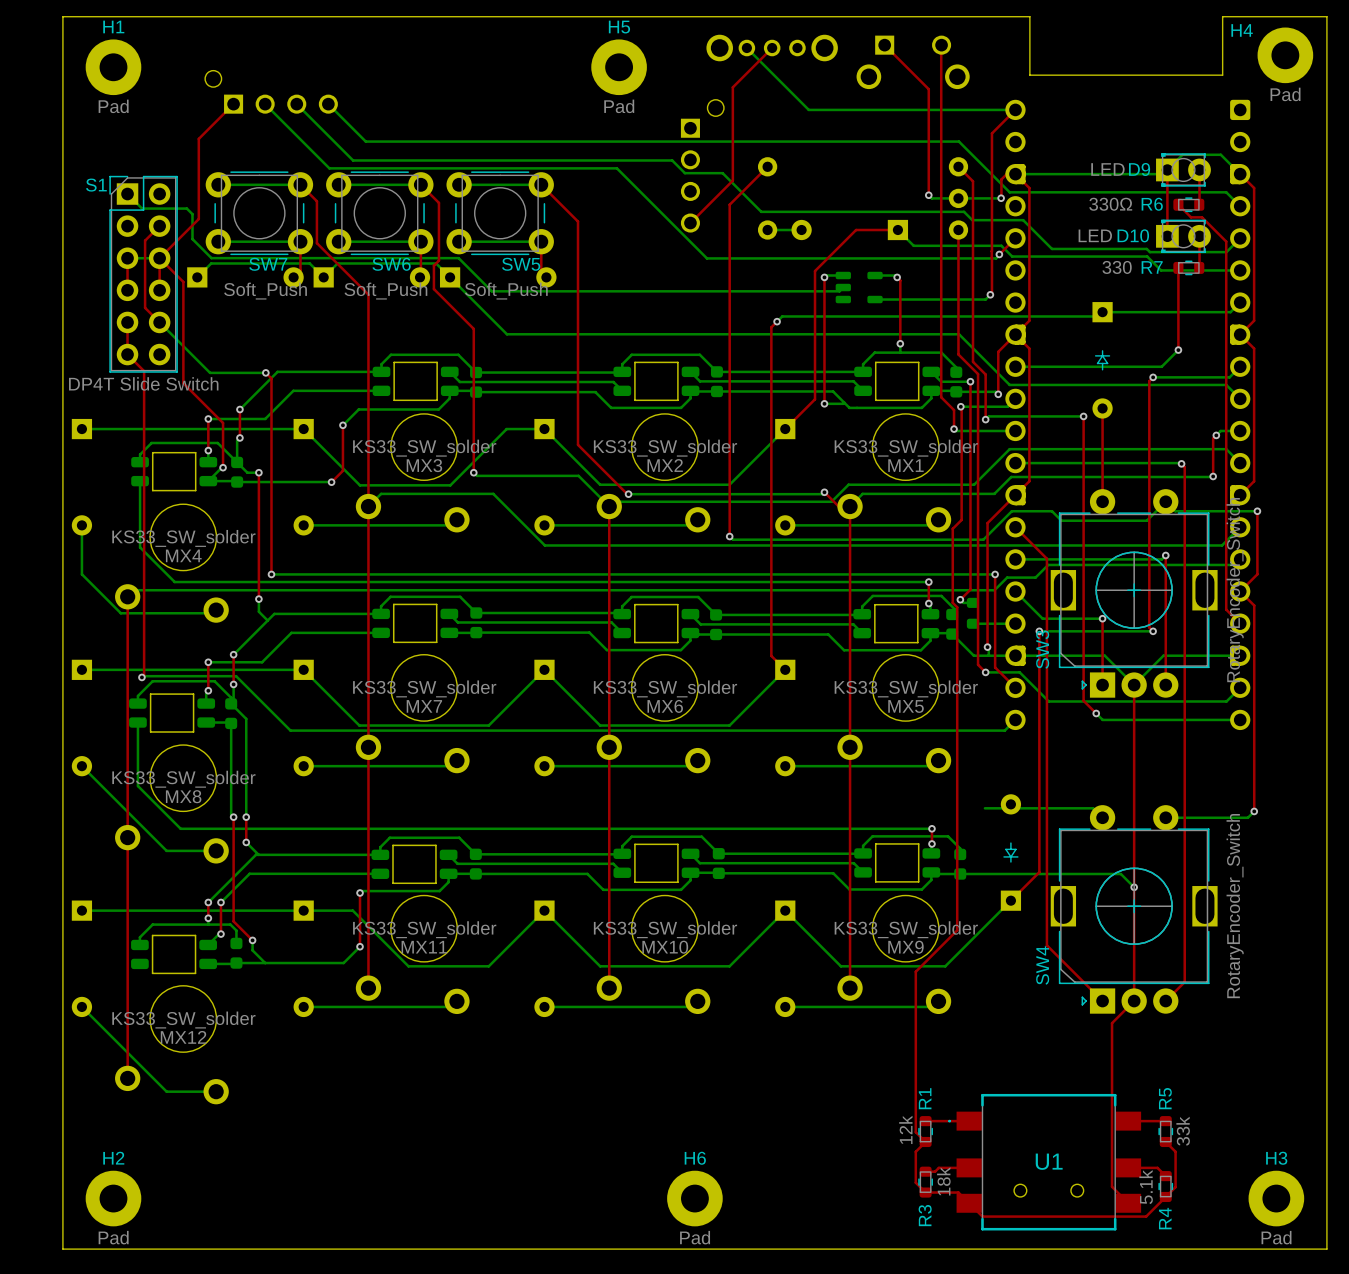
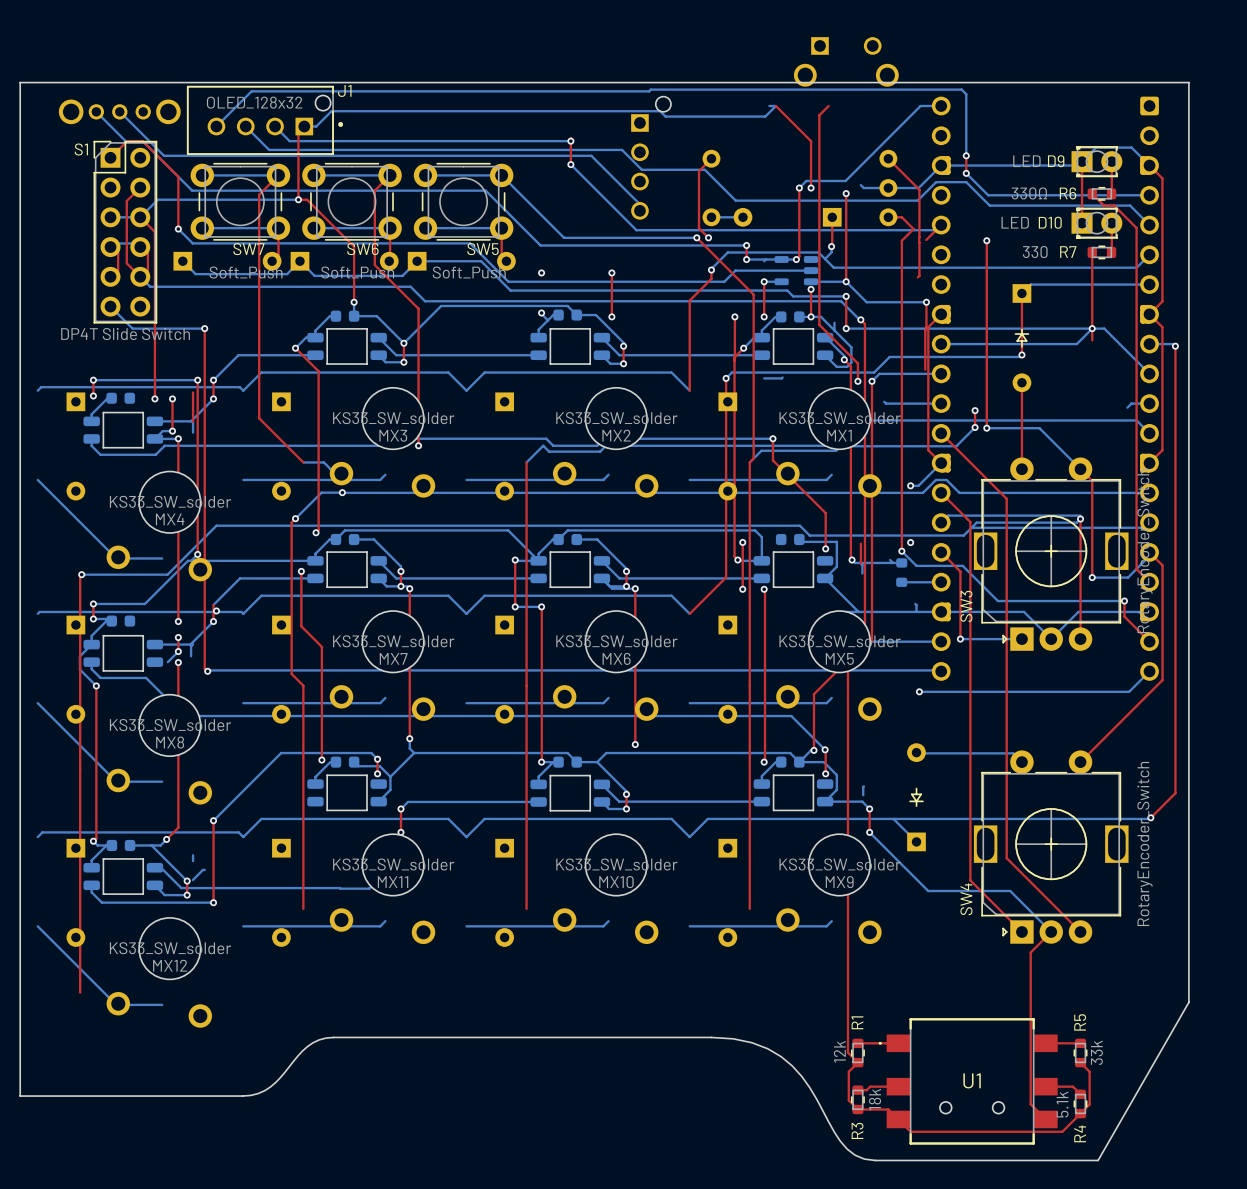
board edge: (62, 16) (1029, 16) (1029, 75) (1222, 75) (1222, 16) (1326, 16) (1326, 1249) (62, 1249) (62, 16) -> (20, 82) (20, 1096) (251, 1095) (264, 1090) (275, 1082) (307, 1046) (319, 1039) (333, 1037) (711, 1037) (752, 1042) (781, 1056) (792, 1065) (809, 1087) (840, 1141) (855, 1155) (864, 1159) (1098, 1160) (1188, 1002) (1188, 82) (20, 82)
top track: (884, 45) (928, 89) (928, 195) -> none
top track: (941, 45) (941, 397) (954, 410) (954, 429) -> none
bottom track: (746, 48) (808, 109) (830, 109) -> none
top track: (772, 48) (732, 87) (732, 180) (690, 223) -> none
part: (772, 48) -> none
H4: Pad (1285, 55) -> none
H1: Pad (113, 67) -> none
H5: Pad (619, 67) -> none
J1 side: bottom (271, 92) -> top (264, 120)
top track: (233, 104) (198, 138) (198, 219) (159, 258) (183, 281) (183, 383) (223, 422) (223, 467) -> none
bottom track: (265, 104) (329, 168) (616, 168) (707, 258) (996, 258) (999, 254) -> none
bottom track: (296, 104) (353, 160) (672, 160) (684, 173) (722, 173) (761, 211) (964, 211) (972, 220) (1023, 220) (1052, 248) (1146, 248) (1149, 252) (1226, 252) (1240, 238) -> (245, 126) (269, 149) (622, 149) (641, 169) (704, 169) (735, 200) (917, 200) (936, 182) (966, 182) (989, 205) (1130, 205) (1149, 225)
bottom track: (328, 104) (365, 141) (958, 141) (1009, 192) (1226, 192) (1240, 206) -> (966, 173) (988, 195) (1149, 195)
top track: none -> (775, 106) (811, 141) (811, 188)
bottom track: (837, 109) (993, 109) -> (799, 188) (806, 180) (845, 180) (920, 106)
bottom track: none -> (775, 106) (765, 116) (665, 116) (660, 111) (331, 111) (316, 126) (304, 127)
top track: none -> (828, 106) (819, 115) (819, 324) (857, 363) (857, 381)
top track: (1015, 109) (991, 133) (991, 200) -> (901, 172) (919, 189)
bottom track: none -> (96, 111) (125, 141) (142, 141) (192, 190) (485, 190) (540, 245) (746, 245)
bottom track: none -> (119, 111) (164, 155) (591, 155) (647, 211)
part: none -> (119, 111)
bottom track: none -> (216, 126) (251, 91) (961, 89) (966, 94) (966, 155)
bottom track: none -> (275, 126) (289, 141) (570, 141)
top track: none -> (304, 126) (298, 132) (298, 199) (307, 199) (354, 246) (354, 302)
top track: none -> (570, 138) (570, 164)
via: none -> (570, 141)
top track: none -> (966, 155) (966, 173)
via: none -> (966, 155)
top track: none -> (110, 157) (127, 141) (142, 141) (178, 176) (178, 229)
bottom track: none -> (570, 164) (636, 230) (936, 230) (941, 225)
via: none -> (570, 164)
top track: (754, 180) (729, 204) (729, 536) -> (699, 171) (699, 228) (708, 237)
top track: (973, 181) (973, 255) -> (888, 217) (901, 217) (913, 229) (901, 240)
via: none -> (966, 173)
top track: (300, 184) (316, 201) (316, 243) (368, 294) (368, 988) -> (278, 175) (259, 194) (259, 418) (303, 462)
top track: (420, 184) (438, 202) (438, 260) (433, 265) (433, 289) (473, 328) (473, 472) (475, 471) -> (390, 175) (374, 190) (374, 265) (418, 308) (418, 445)
top track: (541, 184) (578, 221) (578, 444) (628, 494) -> none
bottom track: none -> (501, 175) (564, 237) (696, 237)
bottom track: (127, 194) (142, 208) (186, 208) (192, 214) (192, 239) (211, 258) -> (178, 229) (192, 243) (196, 243)
via position: (928, 195) -> (846, 193)
top track: none -> (799, 188) (799, 256) (796, 259)
via: none -> (799, 188)
via: none -> (811, 188)
bottom track: (991, 198) (1000, 198) -> (918, 188) (941, 165)
top track: (1001, 198) (1001, 179) (1006, 174) (1015, 174) (1029, 188) (1029, 320) (1015, 334) (1029, 348) (1029, 481) (987, 523) (987, 647) -> none
via: (1001, 198) -> none
top track: none -> (846, 193) (846, 281)
bottom track: none -> (298, 199) (157, 199) (140, 217) (110, 217)
via: none -> (298, 199)
top track: (159, 226) (145, 240) (145, 307) (159, 322) -> (140, 187) (126, 201) (126, 263) (140, 276)
top track: none -> (140, 217) (154, 231) (154, 398)
top track: (897, 230) (856, 230) (815, 271) (815, 399) (785, 429) -> (832, 217) (831, 246)
bottom track: (897, 230) (913, 245) (1001, 245) (1012, 256) (1147, 256) (1161, 270) (1240, 270) -> (711, 270) (727, 252) (818, 252) (833, 267) (1136, 267) (1149, 254)
top track: (958, 230) (958, 354) (978, 374) (978, 664) (985, 672) -> none
via: none -> (178, 229)
top track: none -> (696, 237) (753, 294) (753, 458) (749, 462) (749, 908)
via: none -> (696, 237)
via: none -> (708, 237)
via: (999, 254) -> none
top track: none -> (986, 240) (986, 428)
via: none -> (986, 240)
bottom track: (458, 258) (491, 291) (839, 291) (843, 287) -> (425, 243) (470, 243) (508, 281) (724, 281) (735, 270) (811, 270)
top track: none -> (746, 245) (746, 259)
via: none -> (746, 245)
bottom track: none -> (831, 246) (831, 252) (825, 258)
via: none -> (831, 246)
S1 position: (143, 274) -> (125, 232)
bottom track: none -> (746, 259) (796, 259)
via: none -> (746, 259)
via: none -> (796, 259)
bottom track: (875, 275) (895, 275) (897, 277) -> none
bottom track: (197, 277) (211, 263) (309, 263) (323, 277) (337, 263) (436, 263) (506, 334) (959, 334) (1009, 384) (1226, 384) -> (182, 261) (195, 274) (287, 274) (299, 261) (314, 275) (402, 275) (417, 261) (481, 261) (510, 290) (787, 290) (793, 296) (846, 296)
top track: (824, 277) (824, 299) -> none
via: (824, 277) -> none
top track: (897, 277) (900, 280) (900, 343) -> none
via: (897, 277) -> none
top track: none -> (711, 270) (711, 278) (689, 300) (689, 390)
via: none -> (711, 270)
part rotation: 0° (859, 287) -> 180° (796, 270)
via: none -> (541, 272)
top track: none -> (611, 272) (611, 316)
via: none -> (611, 272)
bottom track: none -> (140, 276) (150, 286) (410, 286) (425, 301) (841, 301) (860, 319)
bottom track: (990, 294) (985, 299) (912, 299) -> (926, 302) (866, 302) (846, 281)
via position: (990, 294) -> (926, 302)
bottom track: none -> (764, 281) (781, 281)
via: none -> (764, 281)
via: none -> (846, 281)
bottom track: (1240, 302) (1230, 312) (1102, 312) (1098, 316) (782, 316) (777, 321) -> (1149, 284) (1030, 284) (1021, 293)
top track: none -> (811, 289) (811, 316)
via: none -> (811, 289)
top track: none -> (846, 296) (846, 328)
via: none -> (846, 296)
bottom track: none -> (354, 302) (354, 316) (376, 316) (403, 343) (441, 305) (567, 305) (576, 315) (595, 315) (623, 342) (623, 346)
via: none -> (354, 302)
top track: (777, 321) (771, 327) (771, 655) (785, 669) -> none
via: (777, 321) -> none
top track: none -> (926, 302) (926, 326) (928, 327) (928, 450) (941, 463)
top track: (127, 322) (127, 354) (144, 371) (144, 675) (141, 677) -> none
bottom track: (159, 322) (210, 372) (265, 372) -> none
bottom track: none -> (110, 306) (132, 328) (204, 328)
bottom track: none -> (541, 312) (547, 320)
via: none -> (541, 312)
bottom track: none -> (558, 315) (553, 315) (538, 329) (538, 337)
part: none -> (567, 315)
bottom track: none -> (335, 316) (329, 316) (315, 330) (315, 337) (306, 337) (295, 348)
part: none -> (345, 316)
via: none -> (611, 316)
top track: none -> (734, 316) (734, 360)
via: none -> (734, 316)
top track: (824, 337) (824, 403) -> (1021, 293) (1021, 354)
via: none -> (764, 316)
bottom track: none -> (775, 316) (761, 330) (761, 337) (754, 337) (743, 348)
part: none -> (790, 316)
bottom track: none -> (799, 316) (821, 316) (851, 347) (851, 362) (847, 366) (836, 366) (825, 355)
via: none -> (811, 316)
top track: none -> (860, 319) (864, 323) (863, 639)
via: none -> (860, 319)
via: (900, 343) -> none
top track: none -> (204, 328) (204, 668) (207, 671)
via: none -> (204, 328)
bottom track: none -> (846, 328) (1104, 328) (1136, 360)
via: none -> (846, 328)
top track: none -> (1092, 328) (1092, 340)
bottom track: none -> (378, 337) (396, 355) (538, 355)
bottom track: none -> (601, 337) (619, 355) (761, 355)
bottom track: none -> (825, 337) (844, 356) (844, 359)
top track: (973, 361) (985, 374) (985, 419) -> (901, 339) (901, 551)
top track: none -> (403, 343) (403, 362)
via: none -> (403, 343)
bottom track: (1240, 366) (1229, 377) (1153, 377) -> (1149, 344) (1173, 344) (1175, 346)
top track: none -> (623, 346) (623, 363)
via: none -> (623, 346)
top track: none -> (1175, 346) (1175, 793) (1150, 817)
via: none -> (1175, 346)
top track: none -> (295, 348) (318, 371) (318, 530) (316, 532)
via: none -> (295, 348)
bottom track: (449, 371) (459, 382) (613, 382) (622, 390) -> none
bottom track: (690, 371) (700, 381) (853, 381) (863, 390) -> none
top track: none -> (743, 348) (734, 357) (734, 556) (737, 560)
via: none -> (743, 348)
bottom track: (863, 371) (863, 364) (874, 352) (941, 352) (956, 367) (956, 372) -> none
bottom track: (863, 371) (716, 371) (699, 354) (631, 354) (622, 364) (621, 372) (476, 372) (458, 354) (391, 354) (381, 364) (381, 371) (277, 371) (239, 409) -> none
bottom track: (931, 371) (941, 381) (970, 381) -> none
top track: (265, 372) (271, 378) (271, 574) -> none
via: (265, 372) -> none
top track: (1153, 377) (1149, 381) (1149, 627) (1153, 631) -> none
via: (1153, 377) -> none
bottom track: none -> (315, 355) (238, 355) (213, 380)
bottom track: none -> (378, 355) (385, 362) (403, 362)
bottom track: none -> (601, 355) (610, 363) (623, 363)
bottom track: none -> (1021, 354) (1019, 356) (889, 356) (874, 372) (731, 372) (726, 378)
via: none -> (1021, 354)
part position: (415, 381) -> (347, 346)
part position: (656, 381) -> (570, 346)
part: (716, 381) -> none
part position: (897, 381) -> (793, 346)
top track: (970, 381) (970, 589) (960, 599) -> none
via: (970, 381) -> none
part: (476, 382) -> none
part: (956, 382) -> none
top track: none -> (844, 359) (850, 366) (852, 560)
via: none -> (844, 359)
via: none -> (403, 362)
via: none -> (623, 363)
bottom track: (381, 390) (293, 390) (265, 418) (208, 418) -> none
bottom track: (998, 394) (995, 391) (931, 390) (931, 398) (921, 407) (849, 407) (833, 391) (690, 390) (690, 398) (681, 407) (611, 407) (595, 392) (449, 390) (449, 398) (438, 409) (358, 409) (342, 425) -> none
via: (998, 394) -> none
bottom track: (1015, 398) (1007, 406) (960, 406) -> (941, 373) (879, 373) (871, 381)
top track: none -> (726, 378) (726, 577) (689, 613)
via: none -> (726, 378)
via: (824, 403) -> none
top track: none -> (93, 380) (93, 395)
bottom track: none -> (93, 380) (197, 380)
via: none -> (93, 380)
top track: none -> (197, 380) (197, 554)
via: none -> (197, 380)
top track: none -> (213, 380) (213, 398)
via: none -> (213, 380)
via: none -> (857, 381)
via: none -> (871, 381)
top track: (960, 406) (961, 519) (952, 528) (952, 602) (957, 607) (957, 930) (915, 971) (915, 1132) -> (871, 381) (871, 640) (847, 664) (848, 1053)
via: (960, 406) -> none
top track: (239, 409) (239, 437) -> none
via: (239, 409) -> none
top track: (1083, 416) (1083, 700) (1096, 713) -> none
bottom track: (1083, 416) (988, 416) (985, 419) -> none
via: (1083, 416) -> none
bottom track: none -> (37, 390) (41, 387) (239, 387) (243, 390) (261, 372) (448, 372) (466, 390) (484, 372) (671, 372) (689, 390)
via: (208, 418) -> none
via: (985, 419) -> none
via: none -> (93, 395)
bottom track: none -> (111, 398) (107, 398) (91, 414) (91, 421)
part: none -> (120, 398)
via: none -> (154, 398)
top track: none -> (172, 398) (172, 431)
via: none -> (172, 398)
bottom track: none -> (213, 398) (191, 421) (154, 421)
via: none -> (213, 398)
top track: (342, 425) (342, 470) (331, 482) -> none
via: (342, 425) -> none
bottom track: (81, 429) (303, 429) (359, 485) (450, 485) (506, 429) (544, 429) (600, 484) (729, 484) (785, 429) -> none
via: (954, 429) -> none
top track: (1216, 435) (1213, 438) (1213, 476) -> none
via: (1216, 435) -> none
bottom track: (239, 437) (237, 440) (237, 462) -> none
via: (239, 437) -> none
top track: none -> (975, 410) (975, 427)
via: none -> (975, 410)
bottom track: (1009, 449) (974, 484) (848, 484) (831, 501) (614, 501) (609, 506) (578, 475) (476, 475) (473, 472) -> (935, 420) (859, 420) (834, 445) (606, 445) (600, 451) (549, 451) (543, 445) (526, 462)
via: (208, 450) -> none
via: none -> (975, 427)
bottom track: none -> (986, 428) (1039, 428) (1080, 469)
via: none -> (986, 428)
bottom track: none -> (172, 431) (162, 431) (154, 438) (178, 438)
via: none -> (172, 431)
bottom track: (140, 462) (140, 454) (151, 442) (217, 442) (247, 472) (258, 472) -> none
bottom track: (1015, 463) (1181, 463) -> none
top track: (1181, 463) (1184, 467) (1184, 982) (1165, 1001) -> (941, 433) (1006, 498) (1006, 858) (1080, 932)
via: (1181, 463) -> none
bottom track: (223, 467) (208, 481) (331, 482) -> none
via: (223, 467) -> none
top track: none -> (178, 438) (178, 621)
via: none -> (178, 438)
top track: none -> (772, 438) (772, 460) (825, 513) (825, 548)
bottom track: none -> (772, 438) (604, 438) (597, 445) (553, 445) (546, 438) (410, 438) (403, 445) (164, 445) (155, 454) (100, 454) (91, 445) (91, 438)
part position: (174, 471) -> (123, 430)
part: (237, 472) -> none
top track: (258, 472) (258, 599) -> none
via: (258, 472) -> none
via position: (473, 472) -> (418, 445)
bottom track: (1213, 476) (1031, 477) -> (975, 427) (956, 446)
via: (1213, 476) -> none
bottom track: (1011, 477) (994, 493) (862, 493) (850, 506) -> (937, 446) (840, 446) (836, 450) (761, 450) (749, 462)
bottom track: (140, 481) (140, 547) (174, 582) (928, 582) -> none
via: (331, 482) -> none
top track: (824, 492) (838, 506) (850, 506) (850, 988) -> none
bottom track: (824, 492) (822, 494) (628, 494) -> none
via position: (824, 492) -> (772, 438)
bottom track: none -> (303, 462) (323, 462) (330, 469) (342, 469)
via: (628, 494) -> none
bottom track: none -> (941, 463) (918, 485) (910, 485)
top track: none -> (1080, 469) (1092, 480) (1092, 577)
bottom track: (368, 506) (381, 493) (493, 493) (544, 545) (1222, 545) (1240, 527) -> none
top track: (609, 506) (609, 988) -> (526, 462) (526, 908)
top track: (1257, 511) (1257, 574) (1240, 591) -> none
bottom track: (1257, 511) (1175, 511) (1165, 501) (1146, 520) (1061, 520) (1052, 511) (1011, 511) (1009, 513) -> (1149, 492) (959, 492) (946, 479) (935, 479)
via: (1257, 511) -> none
bottom track: none -> (37, 479) (116, 558) (162, 558)
bottom track: (456, 519) (451, 525) (303, 525) -> (385, 474) (380, 479) (243, 479)
bottom track: (697, 519) (692, 525) (544, 525) -> (608, 474) (603, 479) (466, 479)
bottom track: (938, 519) (932, 525) (785, 525) -> (831, 474) (826, 479) (689, 479)
via: none -> (910, 485)
bottom track: (81, 525) (81, 574) (120, 613) (212, 613) (216, 610) -> none
via: none -> (342, 492)
bottom track: (995, 527) (983, 539) (732, 539) (729, 536) -> (923, 492) (321, 492) (295, 518)
via: (729, 536) -> none
bottom track: none -> (1080, 515) (948, 515) (941, 522)
top track: none -> (295, 518) (291, 522) (291, 673) (303, 685) (303, 908)
via: none -> (295, 518)
bottom track: (1015, 559) (1053, 559) -> (971, 527) (976, 522)
via: none -> (316, 532)
bottom track: (1039, 573) (1035, 577) (1007, 577) (994, 590) (134, 590) -> (963, 535) (809, 535) (799, 525) (216, 525) (167, 574) (81, 574)
bottom track: (271, 574) (995, 574) -> none
via: (271, 574) -> none
top track: (995, 574) (995, 667) (1015, 687) -> none
via: (995, 574) -> none
part: none -> (345, 539)
bottom track: none -> (354, 539) (374, 539) (400, 566) (400, 571)
part: none -> (567, 539)
bottom track: none -> (576, 539) (597, 539) (626, 568) (626, 571)
part: none -> (790, 539)
bottom track: none -> (799, 539) (801, 541) (836, 541) (836, 566) (825, 578) (858, 611)
top track: none -> (742, 542) (742, 589)
via: none -> (742, 542)
via: none -> (910, 542)
via: (928, 582) -> none
via: none -> (825, 548)
bottom track: none -> (901, 551) (916, 565) (962, 565) (997, 601) (1124, 601)
via: none -> (901, 551)
top track: none -> (941, 552) (960, 571) (960, 639)
bottom track: (1015, 591) (1042, 618) (1102, 618) -> none
bottom track: none -> (1149, 552) (1149, 556) (1128, 577) (1092, 577)
bottom track: none -> (197, 554) (191, 560)
via: none -> (197, 554)
top track: (127, 596) (127, 1078) -> none
bottom track: (258, 599) (258, 611) (267, 620) -> none
via: (258, 599) -> none
top track: none -> (515, 560) (515, 606)
bottom track: none -> (515, 560) (538, 560)
via: none -> (515, 560)
bottom track: none -> (737, 560) (761, 560) (761, 537) (755, 530) (567, 530) (558, 539) (552, 539) (538, 553) (538, 560)
via: none -> (737, 560)
bottom track: none -> (852, 560) (854, 562) (893, 562)
via: none -> (852, 560)
via: (960, 599) -> none
bottom track: none -> (378, 560) (396, 578) (538, 578)
bottom track: none -> (538, 560) (508, 530) (345, 530) (335, 539) (329, 539) (315, 553) (315, 560) (188, 560) (144, 603) (93, 603)
bottom track: none -> (601, 560) (619, 578) (761, 578)
via: (928, 603) -> none
top track: none -> (301, 571) (301, 626) (321, 646) (321, 760)
via: none -> (301, 571)
top track: none -> (400, 571) (400, 586)
via: none -> (400, 571)
top track: none -> (626, 571) (626, 586)
via: none -> (626, 571)
bottom track: (449, 613) (457, 622) (611, 622) (622, 633) -> none
bottom track: (690, 614) (700, 624) (853, 624) (862, 633) -> none
bottom track: (954, 614) (954, 609) (941, 595) (872, 595) (862, 606) (861, 614) (716, 614) (698, 597) (631, 597) (622, 606) (622, 614) (476, 613) (460, 596) (390, 596) (381, 606) (381, 613) (274, 613) (233, 654) -> none
top track: none -> (81, 574) (80, 576) (80, 992)
via: none -> (81, 574)
top track: (1102, 618) (1102, 685) -> none
via: (1102, 618) -> none
bottom track: none -> (315, 578) (240, 578) (213, 604)
bottom track: none -> (378, 578) (386, 586) (407, 586) (409, 588)
bottom track: none -> (601, 578) (612, 588) (635, 588)
part: (476, 622) -> none
part position: (415, 623) -> (347, 569)
part position: (656, 623) -> (570, 569)
part position: (896, 623) -> (793, 569)
part: (716, 624) -> none
part: (952, 624) -> none
via: none -> (400, 586)
bottom track: none -> (609, 586) (626, 586)
via: none -> (626, 586)
top track: none -> (409, 588) (409, 738)
via: none -> (409, 588)
top track: none -> (635, 588) (635, 744)
via: none -> (635, 588)
via: none -> (742, 589)
top track: none -> (764, 589) (764, 762)
via: none -> (764, 589)
top track: (1039, 631) (1039, 872) (1010, 900) -> none
bottom track: (1039, 631) (1153, 631) -> none
via: (1039, 631) -> none
via position: (1153, 631) -> (1092, 577)
bottom track: (381, 632) (291, 632) (262, 662) (208, 662) -> none
bottom track: (449, 632) (589, 632) (606, 650) (680, 650) (690, 640) (690, 633) (697, 633) (828, 634) (844, 650) (920, 650) (930, 640) (930, 633) (951, 633) (973, 655) -> (843, 612) (902, 611)
top track: none -> (1124, 601) (1124, 616) (1149, 641)
via: none -> (1124, 601)
top track: none -> (93, 603) (93, 619)
via: none -> (93, 603)
via: (987, 647) -> none
top track: none -> (213, 604) (213, 621)
bottom track: none -> (515, 606) (541, 606)
via: none -> (515, 606)
top track: none -> (541, 606) (541, 762)
via: none -> (541, 606)
top track: (233, 654) (233, 684) -> none
top track: none -> (843, 612) (843, 664) (813, 694) (813, 750)
bottom track: none -> (37, 613) (39, 611) (241, 611) (243, 613) (261, 595) (448, 595) (466, 613) (484, 595) (671, 595) (689, 613)
top track: (208, 662) (208, 690) -> none
via: (208, 662) -> none
bottom track: none -> (93, 619) (109, 619) (111, 621) (106, 621) (91, 635) (91, 644) (79, 656) (79, 669) (96, 685)
via: none -> (93, 619)
part: none -> (120, 621)
via: none -> (178, 621)
bottom track: none -> (213, 621) (190, 644) (154, 644)
via: none -> (213, 621)
bottom track: (81, 669) (303, 669) (359, 725) (488, 725) (544, 669) (600, 725) (729, 725) (785, 669) -> none
bottom track: (985, 672) (1019, 672) (1048, 701) (1226, 701) (1240, 687) -> none
via: (985, 672) -> none
bottom track: (141, 677) (236, 676) (290, 730) (1004, 730) (1015, 719) -> (207, 671) (941, 671)
via: (141, 677) -> none
top track: none -> (178, 637) (178, 651)
via: none -> (178, 637)
bottom track: (233, 684) (233, 701) (231, 703) -> none
via: (233, 684) -> none
bottom track: none -> (863, 639) (866, 641) (941, 641)
bottom track: none -> (960, 639) (1021, 639)
via: none -> (960, 639)
top track: (1134, 685) (1134, 1001) -> none
via: (208, 690) -> none
bottom track: none -> (178, 651) (167, 662)
via: none -> (178, 651)
bottom track: (137, 703) (137, 695) (152, 681) (214, 681) (231, 697) (231, 703) -> none
bottom track: (231, 703) (246, 718) (246, 817) -> none
bottom track: none -> (91, 662) (91, 669) (100, 677) (146, 677) (184, 716) (791, 716) (825, 749)
top track: none -> (178, 662) (178, 827) (166, 839)
via: none -> (178, 662)
part position: (172, 713) -> (123, 653)
part: (231, 713) -> none
bottom track: (1096, 713) (1102, 719) (1240, 719) -> (919, 691) (1129, 691) (1149, 671)
via: (1096, 713) -> none
via: none -> (207, 671)
bottom track: (137, 722) (137, 786) (180, 828) (931, 828) -> none
bottom track: (206, 722) (231, 723) (231, 814) (233, 817) -> none
top track: (1254, 729) (1254, 811) -> (1162, 680) (1080, 762)
top track: none -> (96, 685) (96, 838) (93, 841)
via: none -> (96, 685)
via: none -> (919, 691)
bottom track: (456, 760) (451, 766) (303, 766) -> (385, 697) (380, 703) (243, 703)
bottom track: (697, 760) (692, 766) (544, 766) -> (608, 697) (603, 703) (466, 703)
bottom track: (938, 760) (932, 766) (785, 766) -> (831, 697) (826, 703) (689, 703)
bottom track: (81, 766) (166, 850) (216, 850) -> (37, 703) (116, 781) (162, 781)
bottom track: none -> (409, 738) (409, 748) (414, 753)
via: none -> (409, 738)
via: none -> (635, 744)
top track: none -> (825, 749) (825, 773)
via: none -> (825, 749)
bottom track: none -> (813, 750) (811, 750) (799, 762)
via: none -> (813, 750)
bottom track: none -> (414, 753) (567, 753) (576, 762) (597, 762)
bottom track: none -> (414, 753) (390, 776)
bottom track: (1254, 811) (1247, 817) (1165, 817) -> none
via: (1254, 811) -> none
bottom track: none -> (377, 759) (371, 753) (281, 753) (213, 820)
via: none -> (377, 759)
via: none -> (321, 760)
top track: (233, 817) (233, 921) (252, 940) -> none
via: (233, 817) -> none
top track: (246, 817) (246, 842) -> (400, 808) (400, 832)
via: (246, 817) -> none
bottom track: none -> (330, 762) (315, 777) (315, 784)
part: none -> (345, 762)
bottom track: none -> (354, 762) (358, 766) (379, 766) (390, 776)
bottom track: none -> (541, 762) (558, 762)
via: none -> (541, 762)
bottom track: none -> (553, 762) (538, 776) (538, 784)
part: none -> (567, 762)
bottom track: none -> (597, 762) (626, 791) (626, 794)
bottom track: none -> (597, 762) (606, 753) (790, 753) (799, 762)
via: none -> (764, 762)
bottom track: none -> (775, 762) (761, 776) (761, 784)
part: none -> (790, 762)
bottom track: none -> (799, 762) (823, 762) (836, 775) (836, 789) (825, 801) (862, 801) (869, 808)
top track: (931, 828) (931, 843) -> none
via: (931, 828) -> none
via: none -> (377, 773)
via: none -> (825, 773)
bottom track: none -> (390, 776) (390, 789) (378, 801)
bottom track: none -> (601, 784) (619, 801) (761, 801)
bottom track: (246, 842) (258, 854) -> none
via: (246, 842) -> none
via: (931, 843) -> none
top track: none -> (626, 794) (626, 808)
via: none -> (626, 794)
part position: (1010, 852) -> (916, 797)
bottom track: (690, 853) (699, 863) (853, 863) (863, 872) -> none
bottom track: (448, 854) (457, 863) (613, 863) (622, 872) -> none
bottom track: (960, 854) (960, 848) (948, 836) (872, 836) (863, 845) (862, 853) (718, 853) (701, 836) (631, 836) (622, 846) (621, 854) (475, 854) (459, 837) (389, 837) (380, 847) (380, 854) (255, 854) (208, 902) -> none
bottom track: none -> (538, 801) (408, 801) (400, 808)
bottom track: none -> (601, 801) (608, 808) (626, 808)
part position: (897, 862) -> (793, 792)
part position: (656, 863) -> (570, 793)
part: (718, 863) -> none
part position: (414, 864) -> (347, 792)
part: (475, 864) -> none
part: (960, 864) -> none
via: none -> (400, 808)
via: none -> (626, 808)
top track: none -> (869, 808) (869, 832)
via: none -> (869, 808)
bottom track: (380, 873) (249, 873) (220, 902) -> none
bottom track: (475, 873) (448, 873) (448, 882) (439, 891) (361, 891) (360, 892) -> none
bottom track: (475, 873) (587, 873) (603, 889) (681, 889) (690, 880) (690, 872) (833, 873) (849, 889) (921, 889) (931, 879) (931, 872) (932, 874) (1120, 874) (1134, 887) -> none
bottom track: none -> (1150, 817) (707, 818) (689, 837) (671, 818) (484, 818) (466, 837) (448, 818) (261, 818) (243, 837) (238, 832) (42, 832) (37, 837)
via: none -> (1150, 817)
bottom track: none -> (893, 818) (916, 841)
top track: none -> (213, 820) (213, 902)
via: none -> (213, 820)
via: (1134, 887) -> none
top track: (360, 892) (360, 946) -> none
via: (360, 892) -> none
bottom track: none -> (400, 832) (400, 857) (369, 888) (181, 888) (160, 867) (154, 867)
via: none -> (400, 832)
bottom track: none -> (869, 832) (928, 891) (1010, 891) (1051, 932)
via: none -> (869, 832)
bottom track: (1010, 900) (945, 966) (840, 966) (785, 910) (729, 966) (600, 966) (544, 910) (488, 966) (408, 966) (352, 910) (81, 910) -> none
bottom track: none -> (166, 839) (160, 845) (130, 845)
via: none -> (166, 839)
top track: (208, 902) (208, 918) -> (377, 759) (377, 773)
via: (208, 902) -> none
top track: (220, 902) (220, 934) -> none
via: (220, 902) -> none
bottom track: none -> (93, 841) (97, 845) (111, 845)
via: none -> (93, 841)
bottom track: none -> (106, 845) (91, 860) (91, 867)
part: none -> (120, 845)
bottom track: none -> (151, 845) (187, 881)
via: (208, 918) -> none
via: (220, 934) -> none
bottom track: (252, 940) (252, 950) (265, 963) -> none
via: (252, 940) -> none
bottom track: (236, 943) (236, 930) (230, 924) (152, 924) (139, 937) (139, 944) -> none
top track: none -> (187, 881) (187, 895)
via: none -> (187, 881)
bottom track: (360, 946) (343, 963) (208, 963) -> none
via: (360, 946) -> none
bottom track: none -> (91, 885) (91, 892) (101, 902) (213, 902)
bottom track: none -> (154, 885) (164, 895) (187, 895)
part: (236, 953) -> none
part position: (174, 954) -> (123, 876)
via: none -> (187, 895)
via: none -> (213, 902)
bottom track: (456, 1001) (451, 1006) (303, 1006) -> (385, 921) (380, 926) (243, 926)
bottom track: (697, 1001) (692, 1006) (544, 1006) -> (608, 921) (603, 926) (466, 926)
bottom track: (938, 1001) (932, 1006) (785, 1006) -> (831, 921) (826, 926) (689, 926)
bottom track: (81, 1006) (166, 1091) (216, 1091) -> (37, 926) (116, 1004) (162, 1004)
H2: Pad (113, 1198) -> none
H6: Pad (694, 1198) -> none
H3: Pad (1276, 1198) -> none

